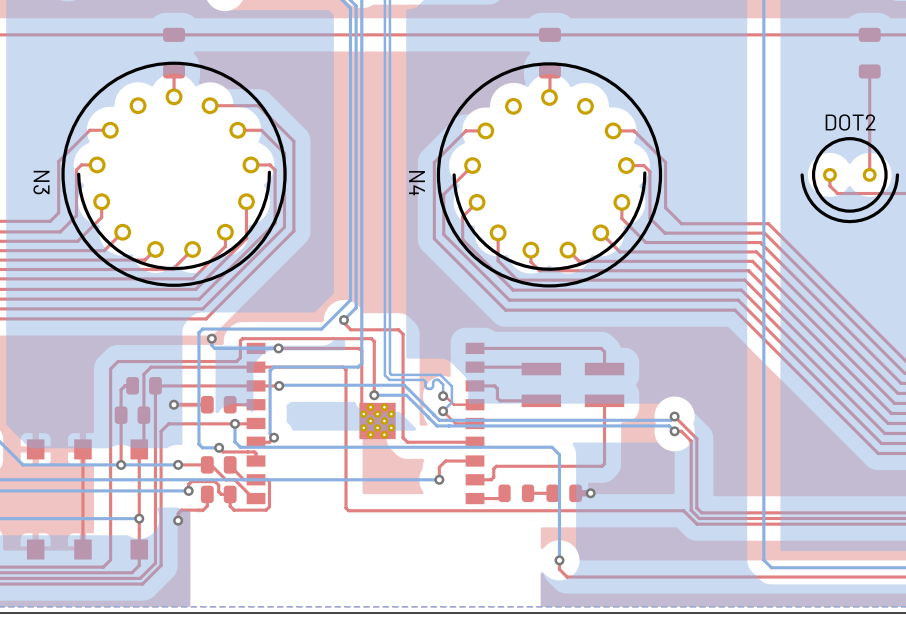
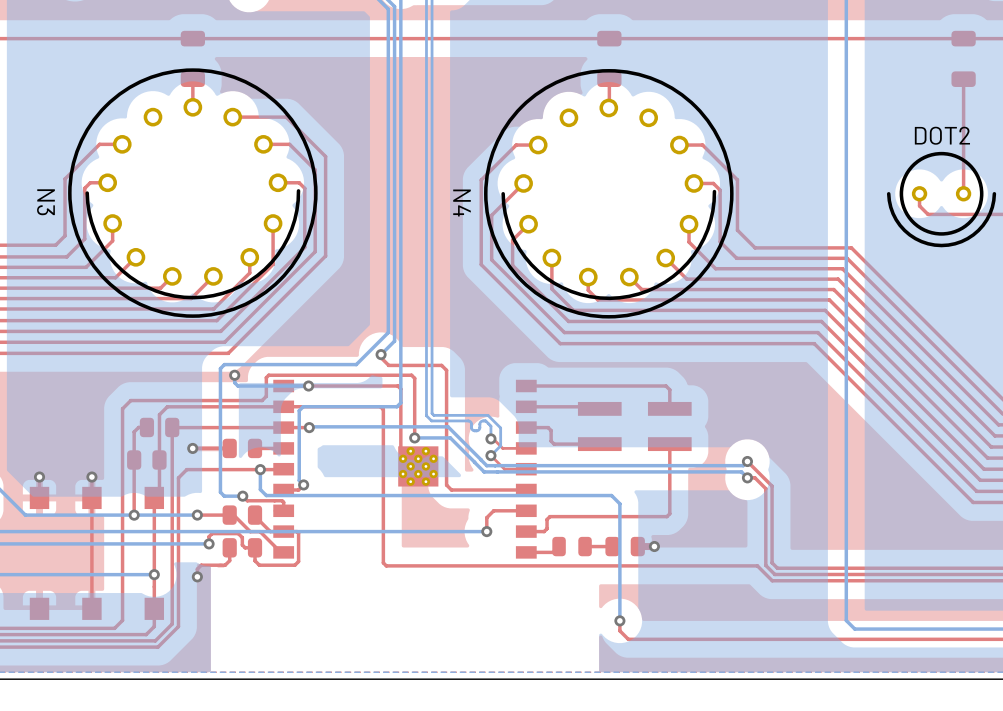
via: none -> (39, 477)
via: none -> (91, 477)

